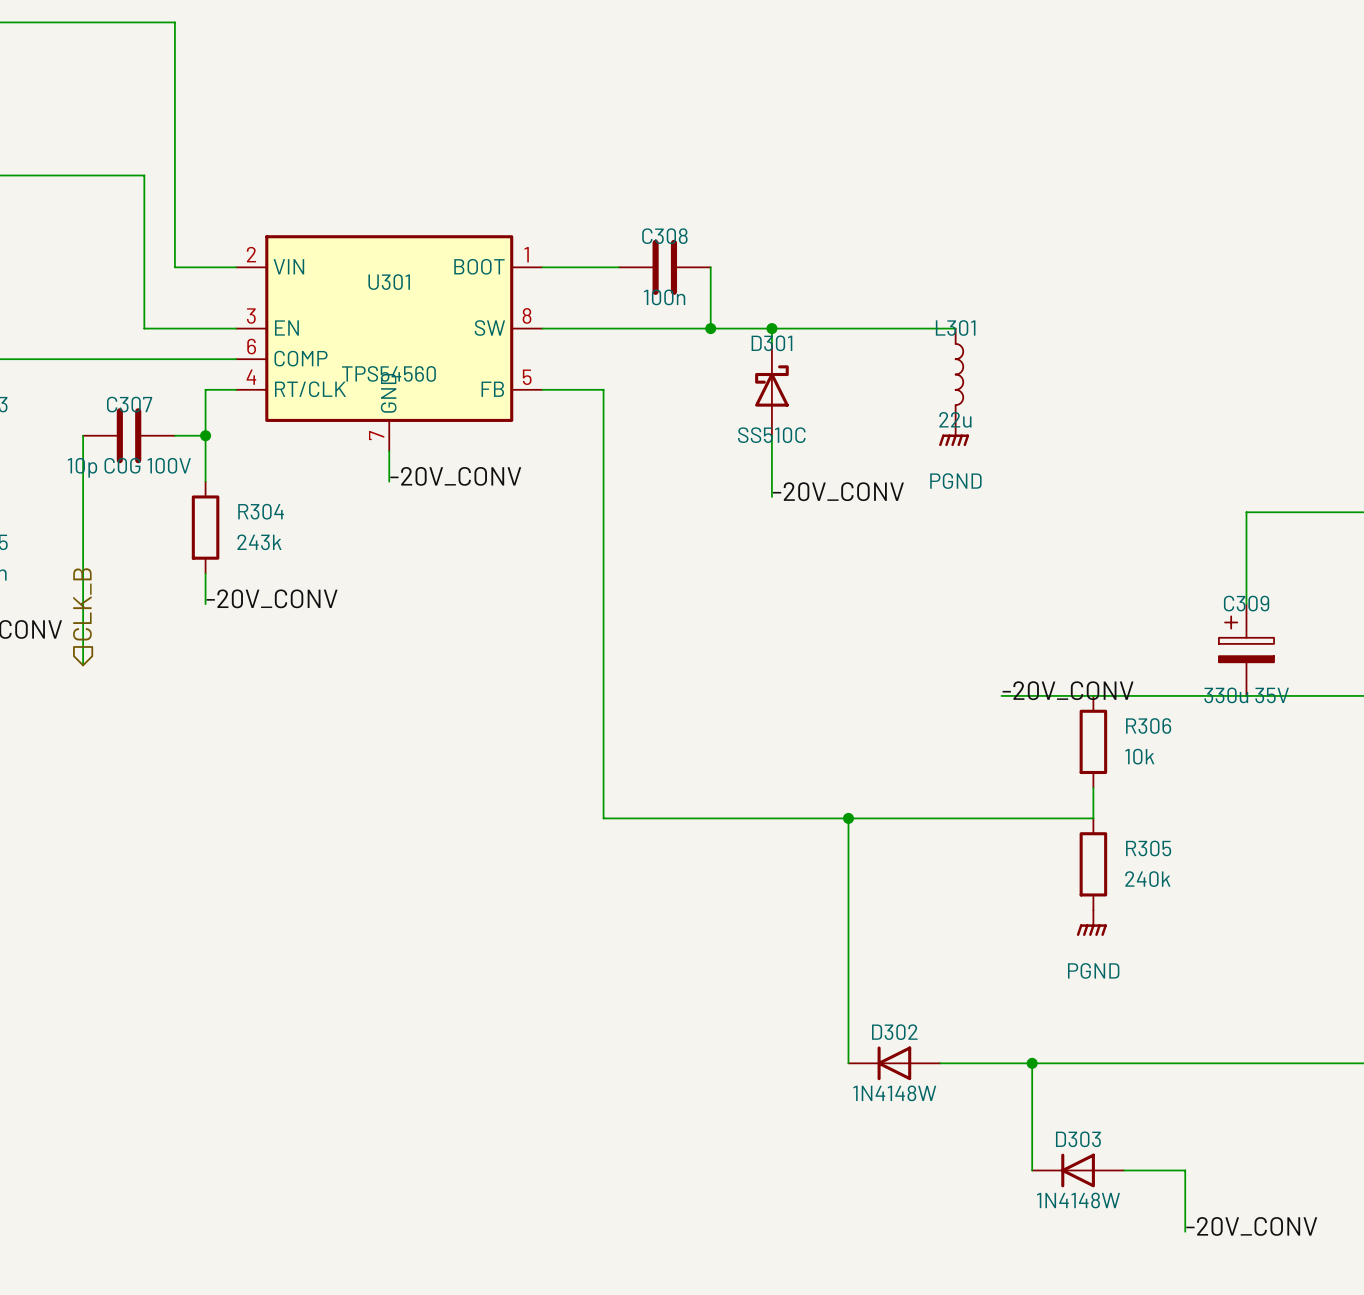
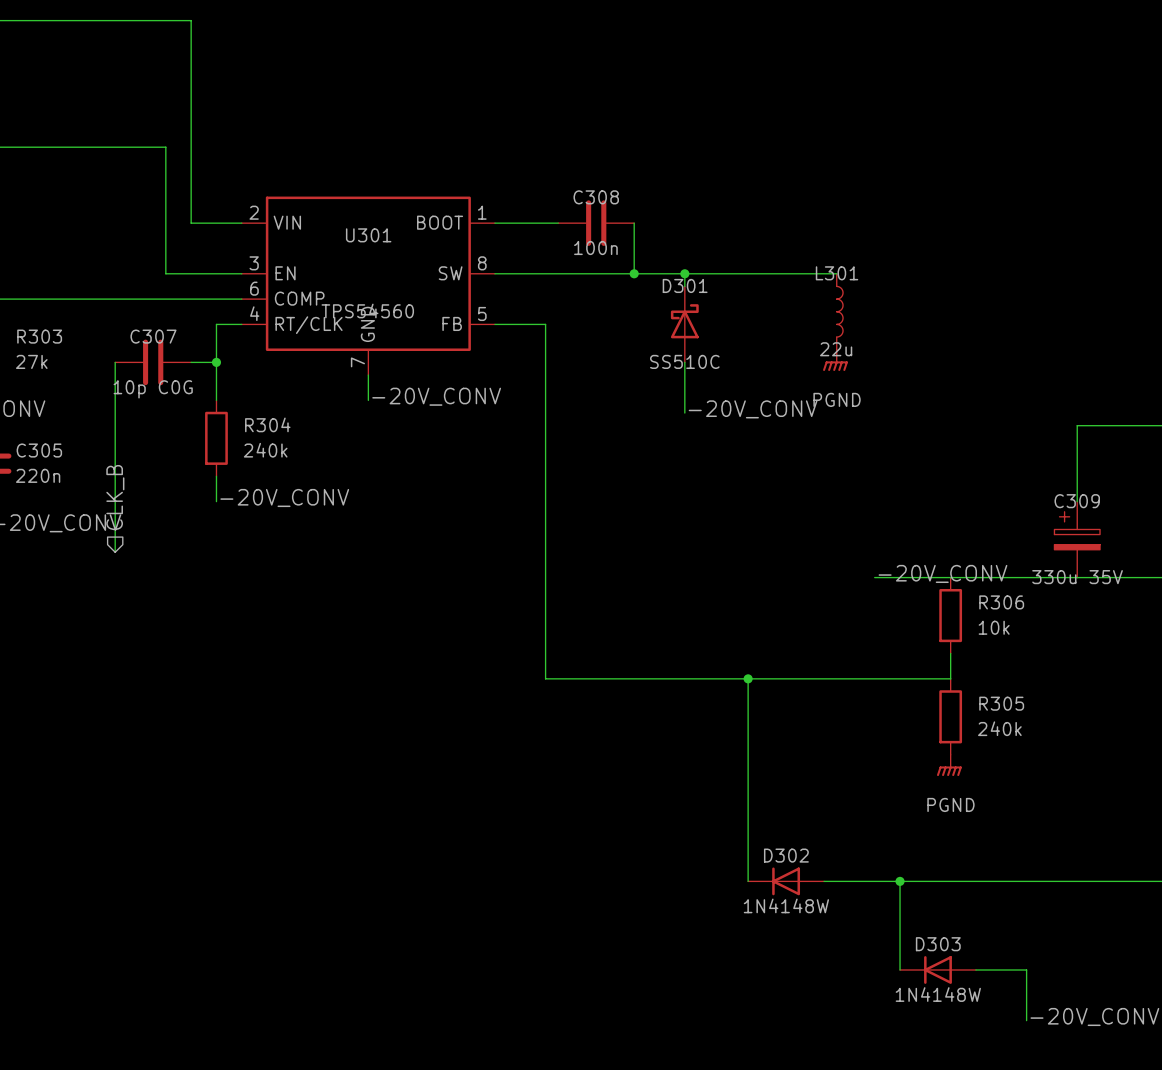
C307 value: 10p C0G 100V (129, 467) -> 10p C0G (153, 389)
R304 value: 243k (259, 542) -> 240k (265, 450)

